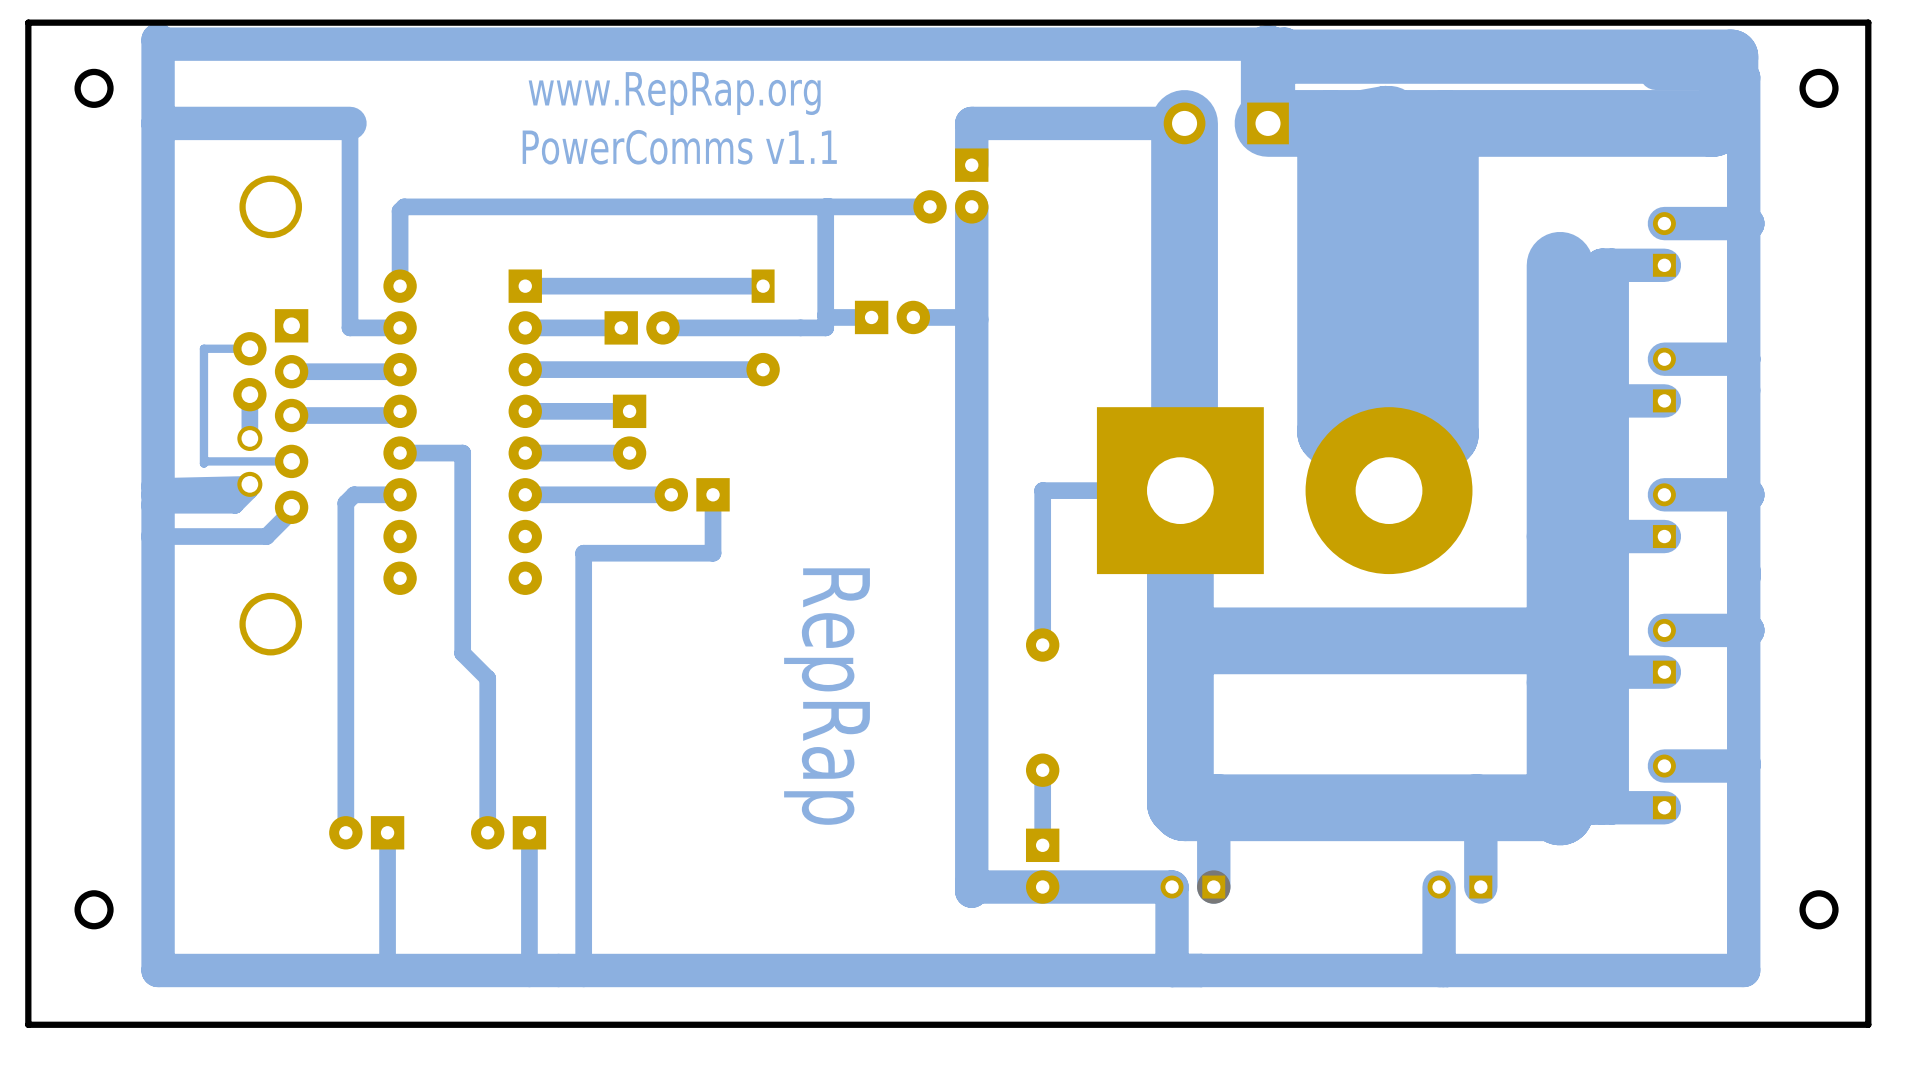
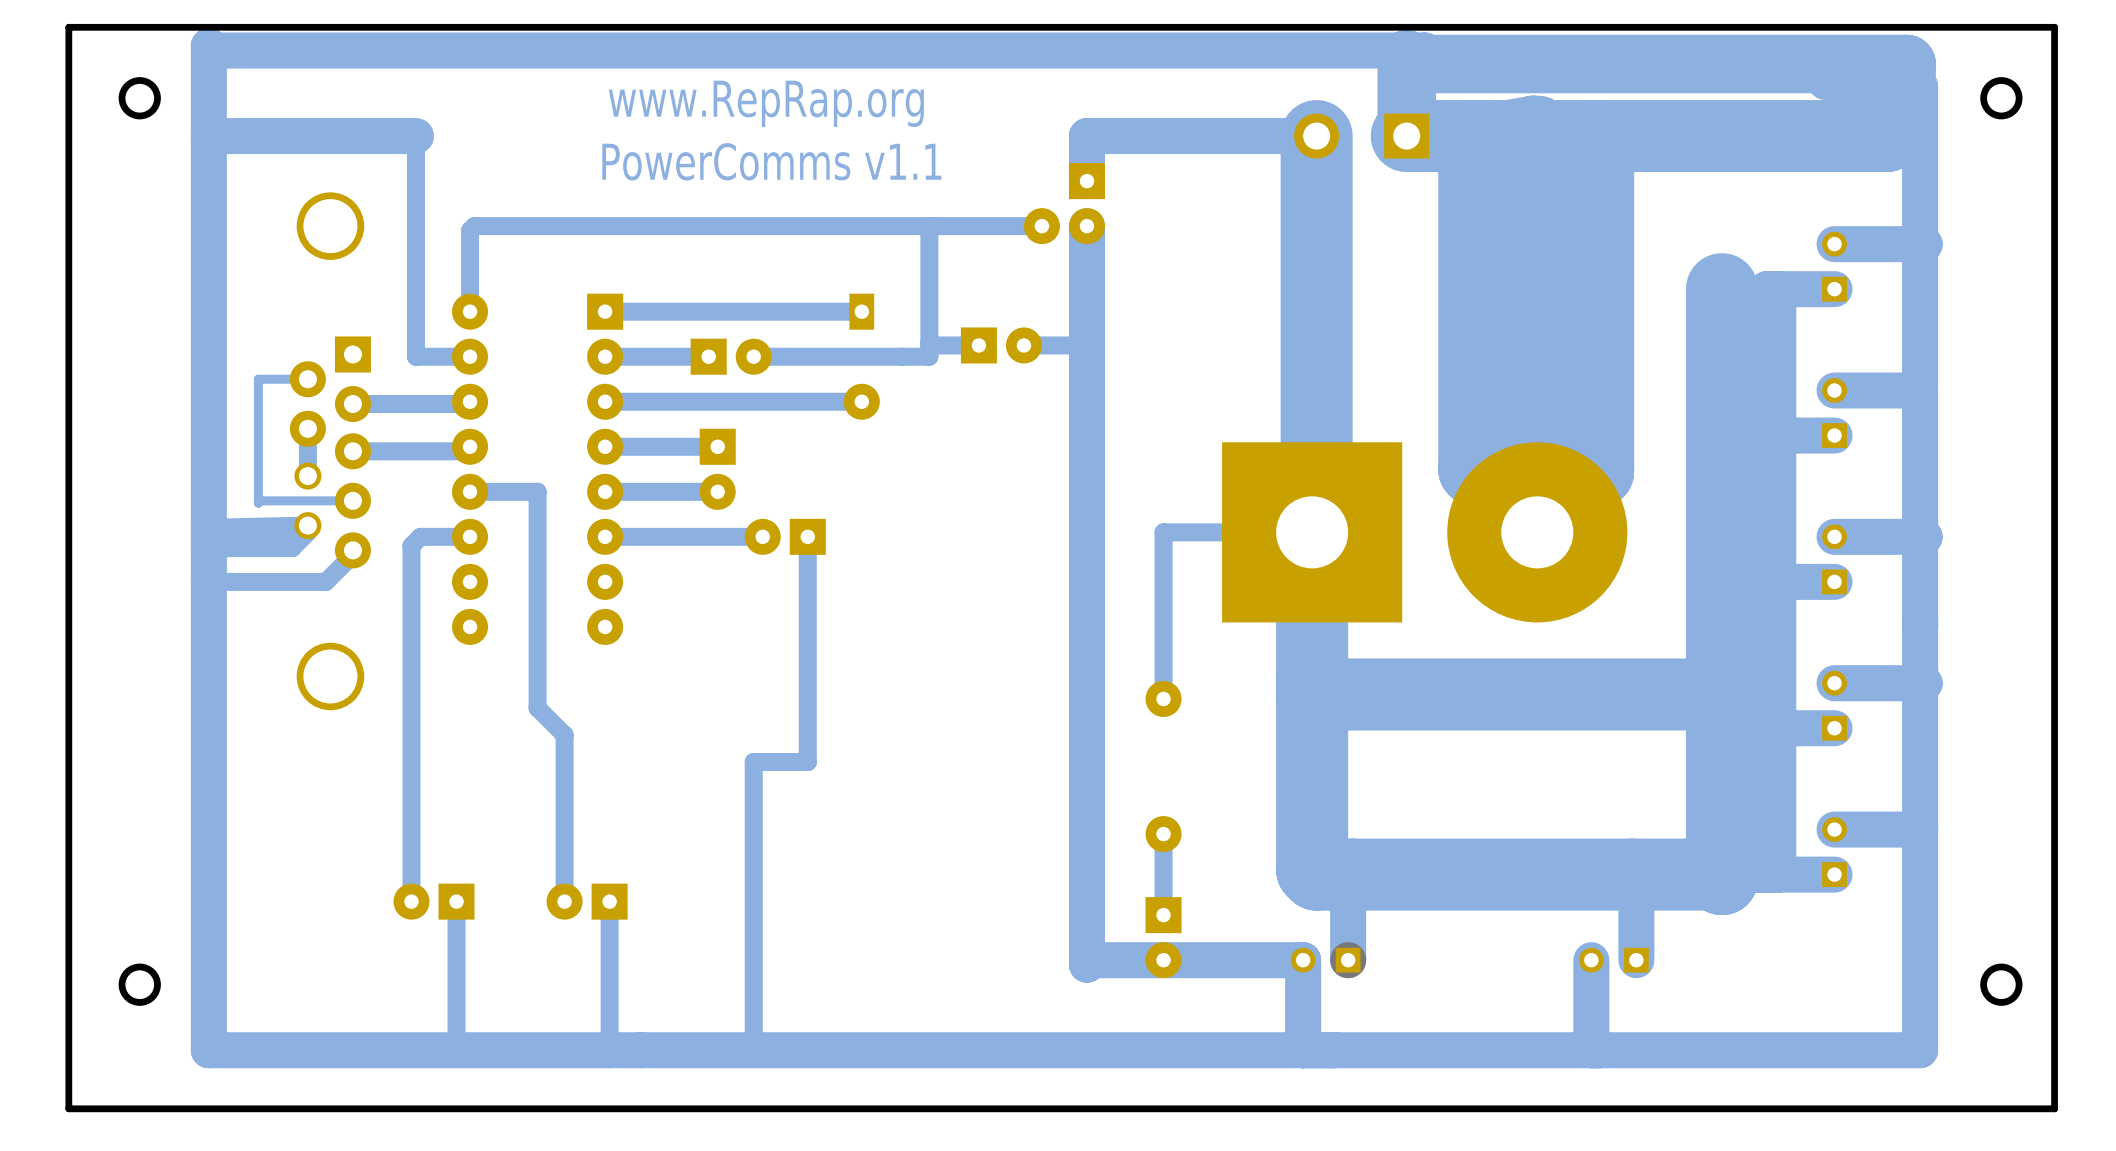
track: (713, 553) (583, 553) (583, 974) -> (807, 599) (807, 762) (753, 762) (753, 1050) (641, 1050)
text: RepRap (827, 696) -> none

